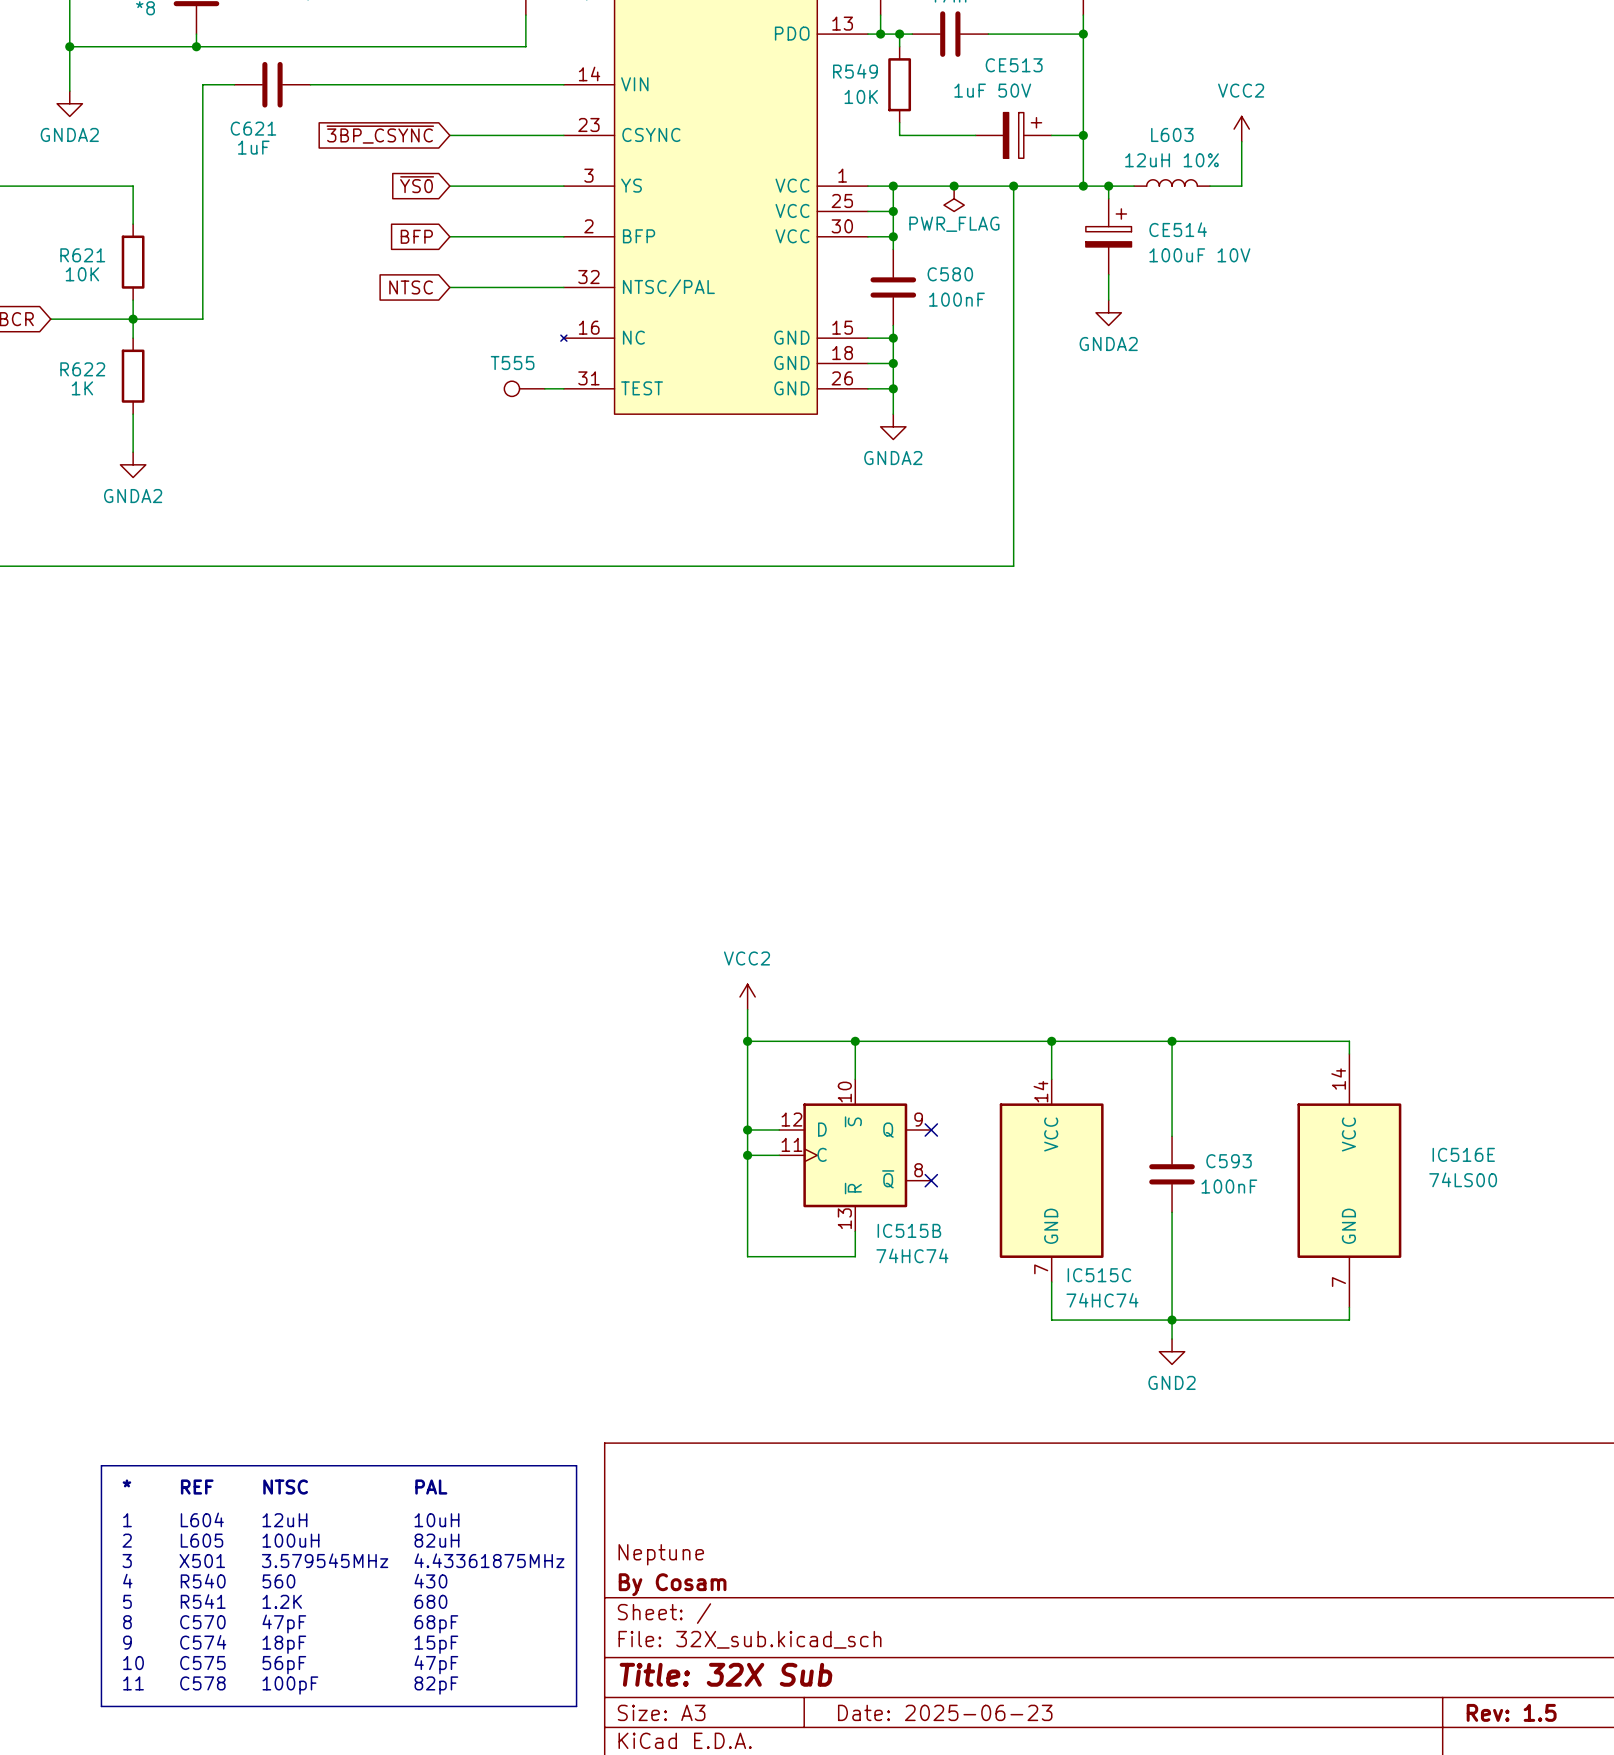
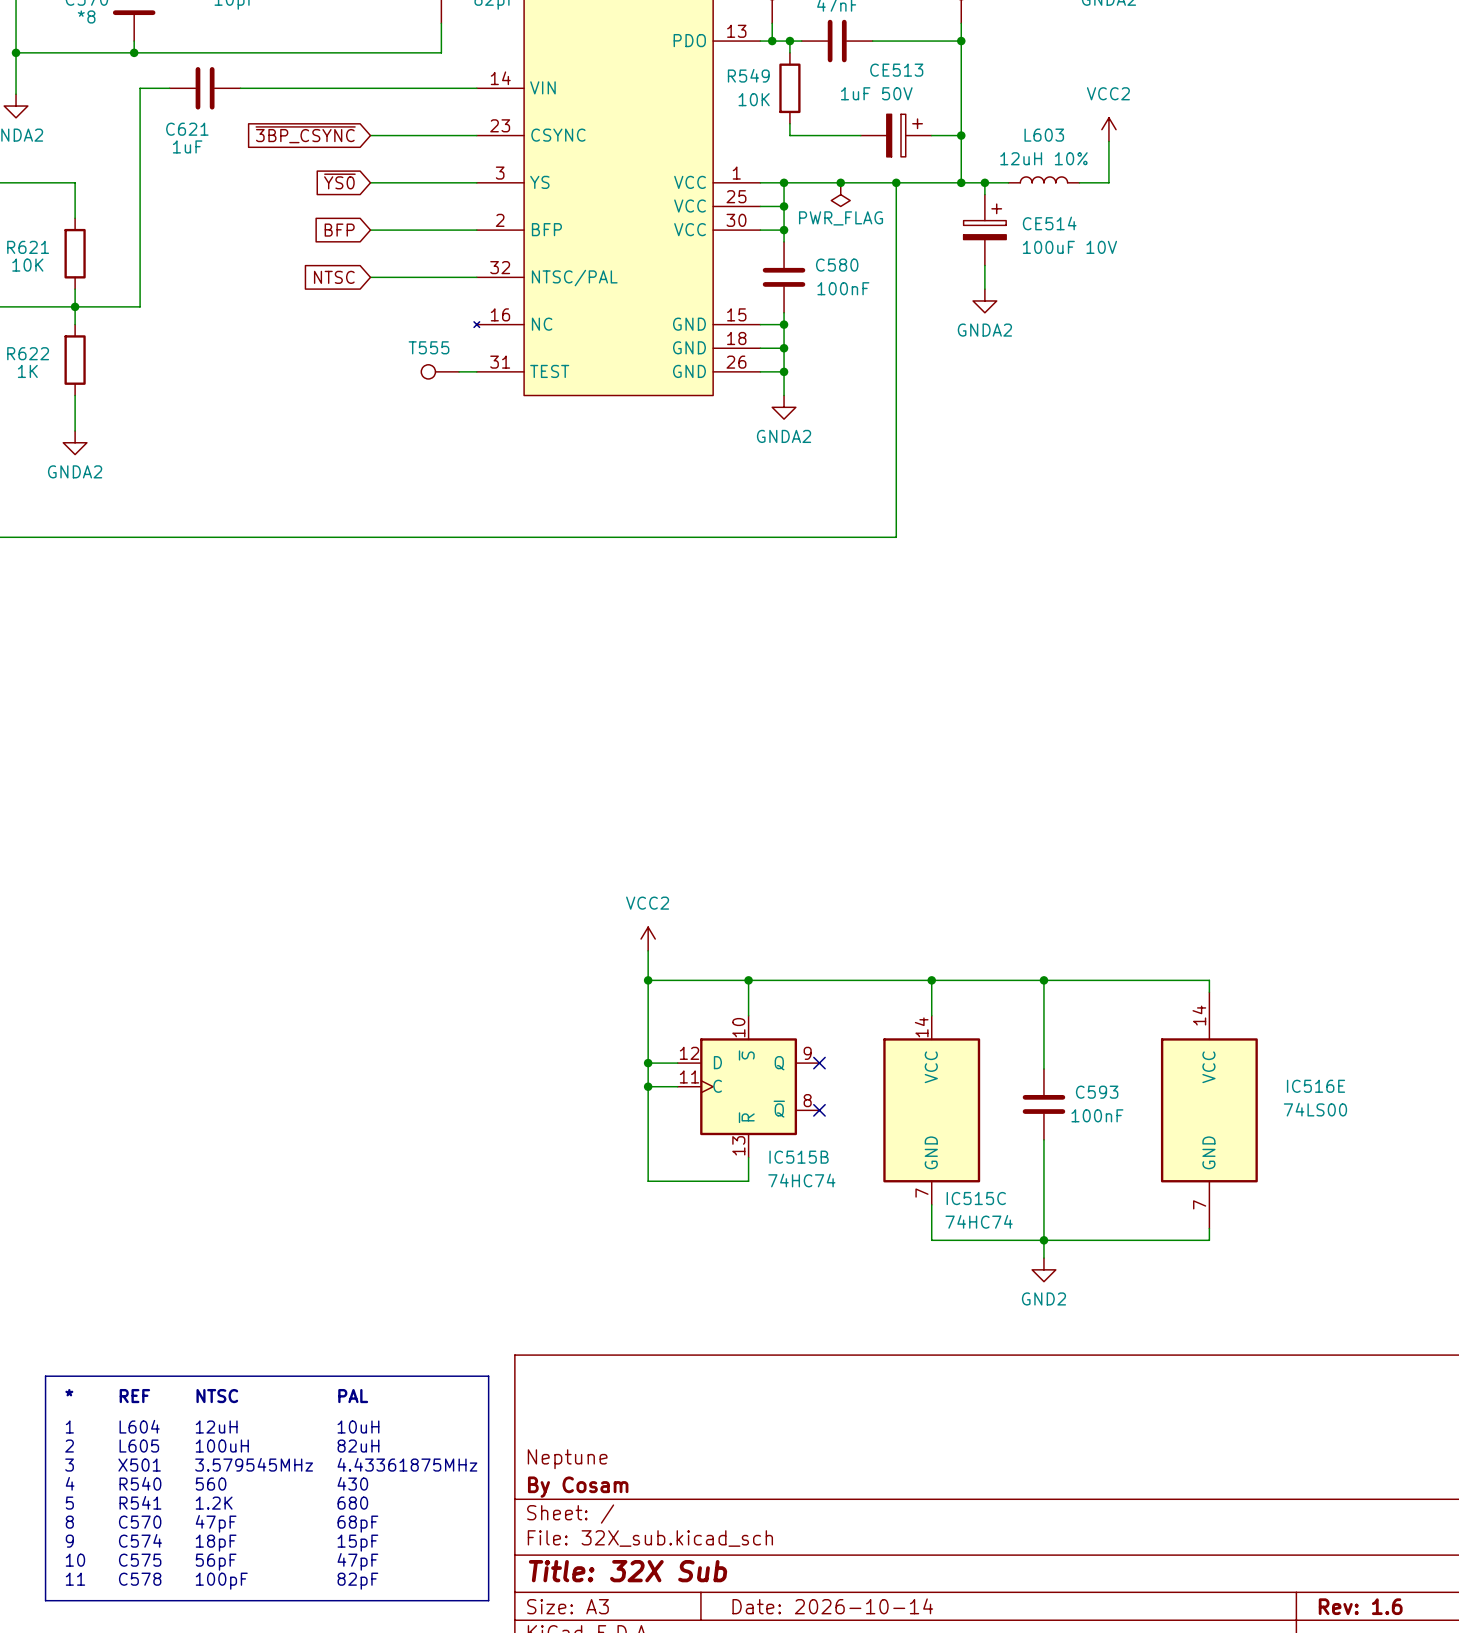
title block: Date: 2025-06-23 (945, 1712) -> Date: 2026-10-14 (832, 1606)
title block: Rev: 1.5 (1511, 1712) -> Rev: 1.6 (1360, 1606)

